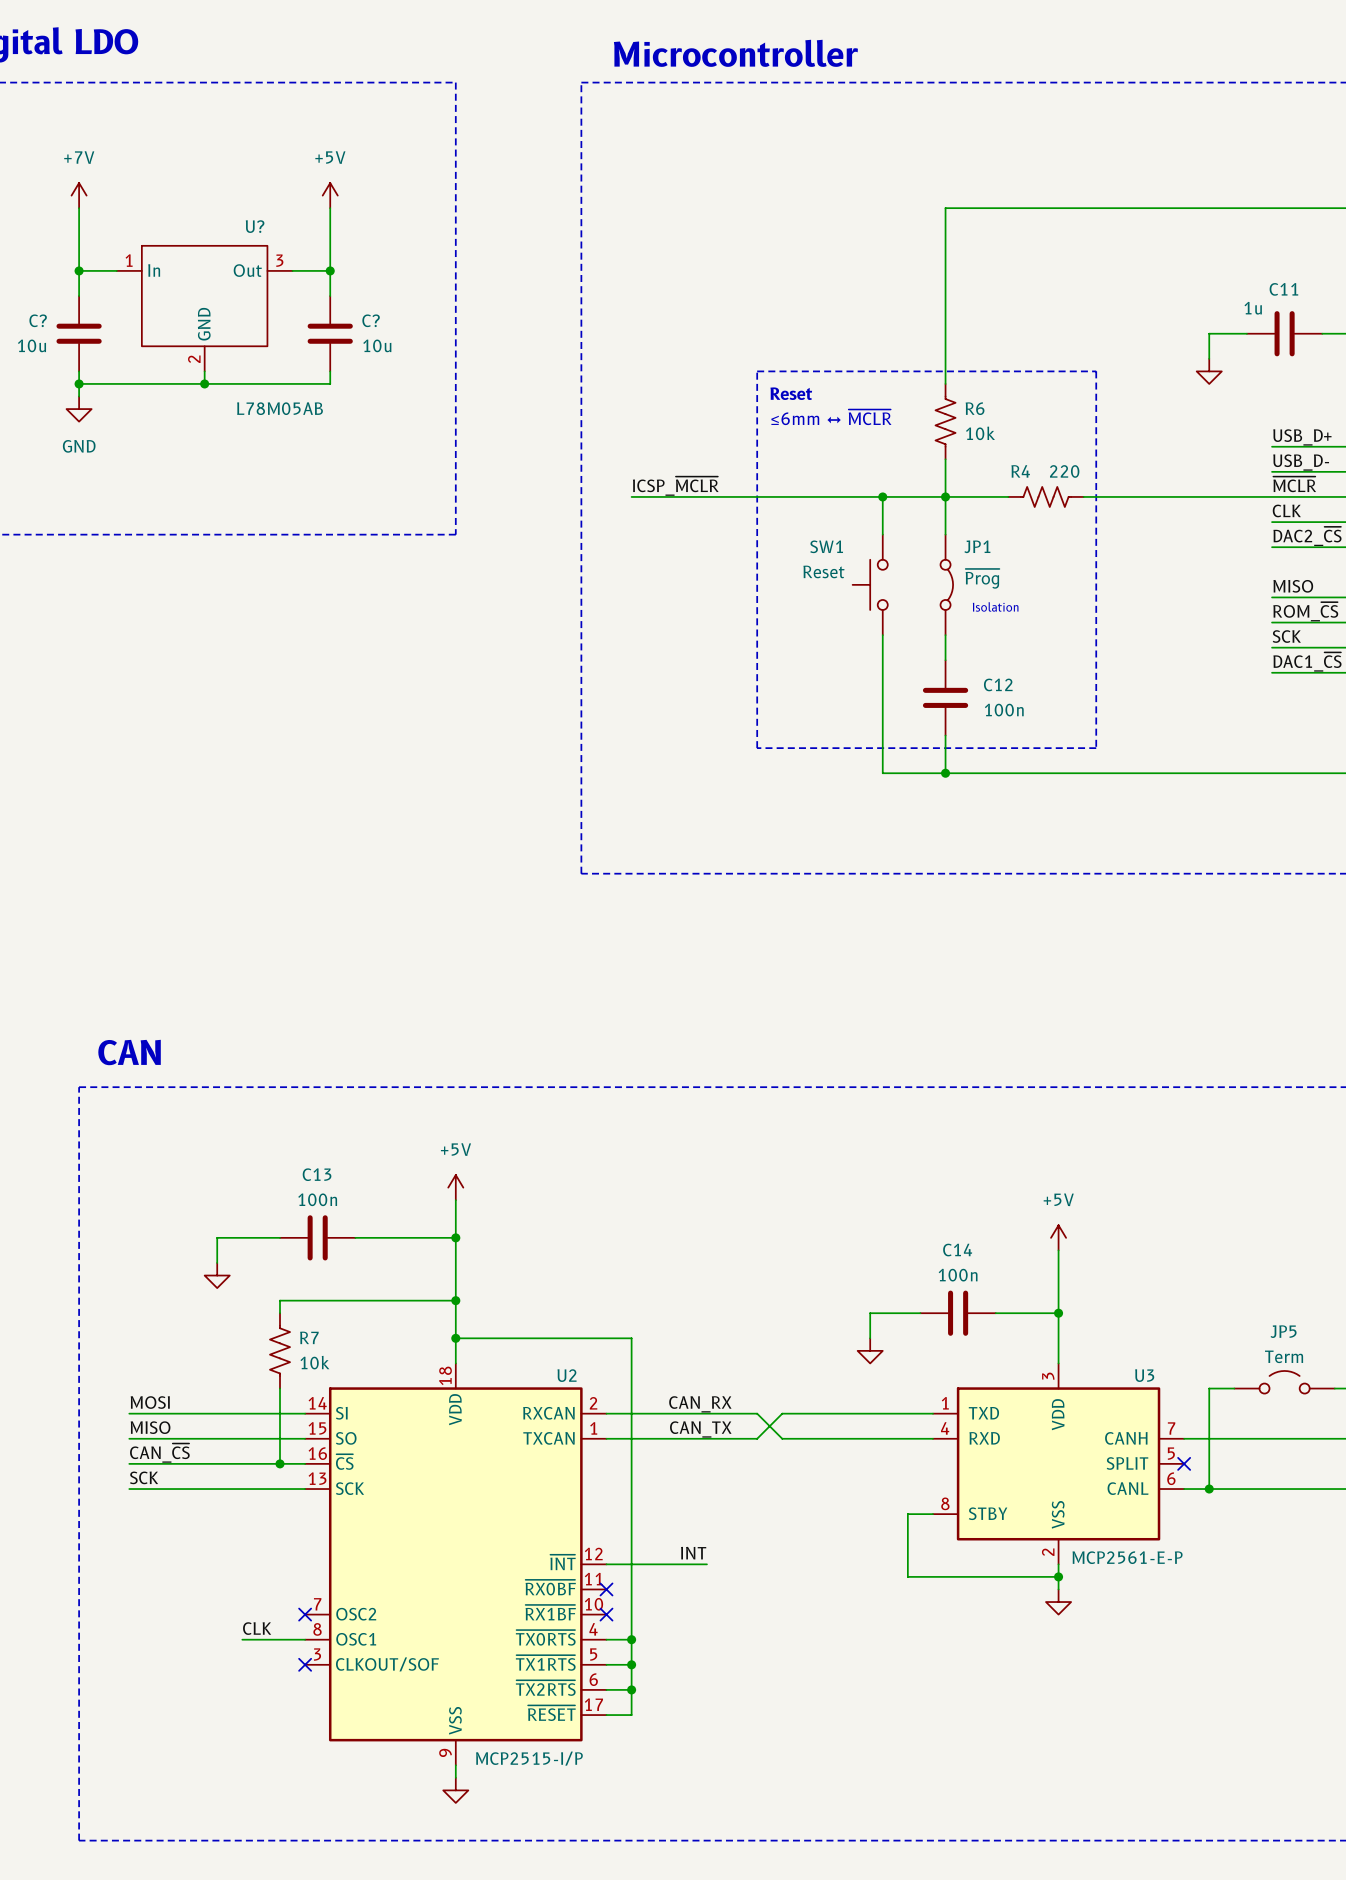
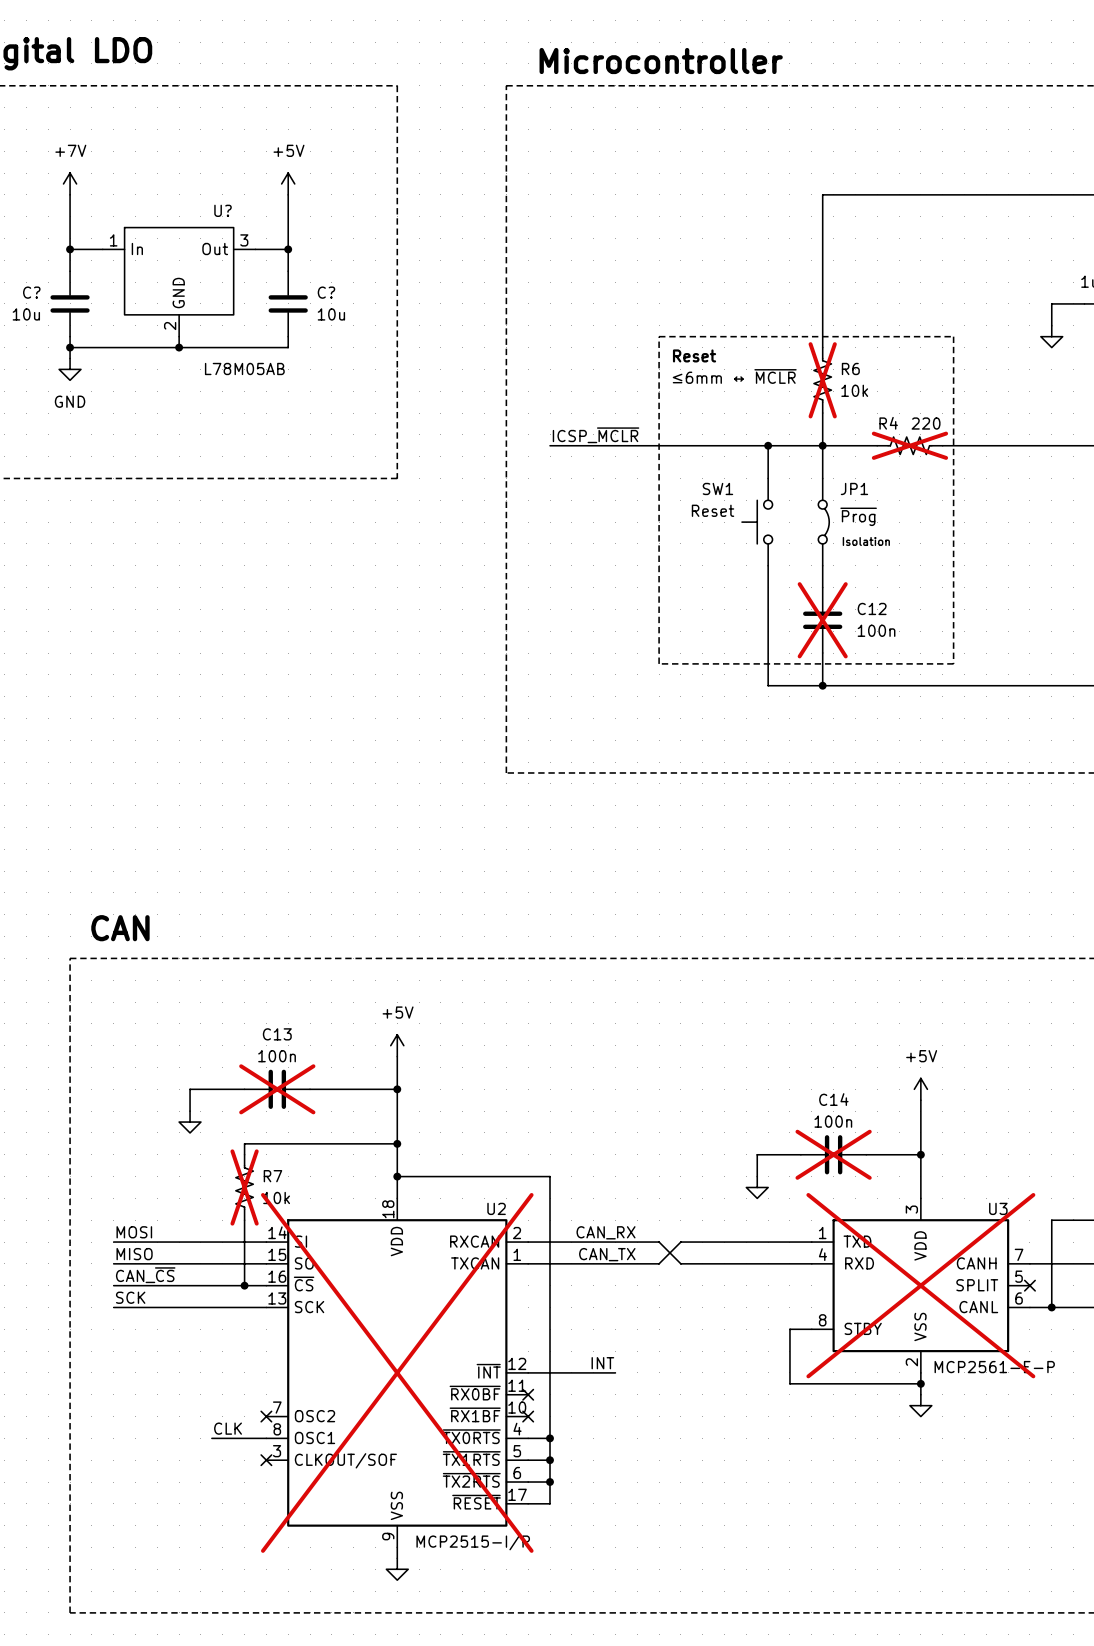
R6 do-not-place cross: none -> (822, 380)
R4 do-not-place cross: none -> (909, 445)
C12 do-not-place cross: none -> (822, 620)
C13 do-not-place cross: none -> (277, 1089)
C14 do-not-place cross: none -> (833, 1154)
R7 do-not-place cross: none -> (244, 1187)
U3 do-not-place cross: none -> (920, 1285)
U2 do-not-place cross: none -> (397, 1372)

